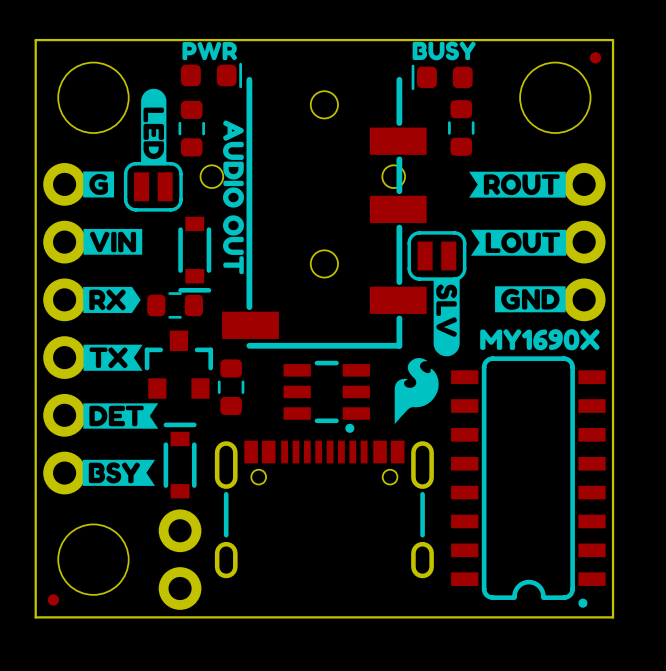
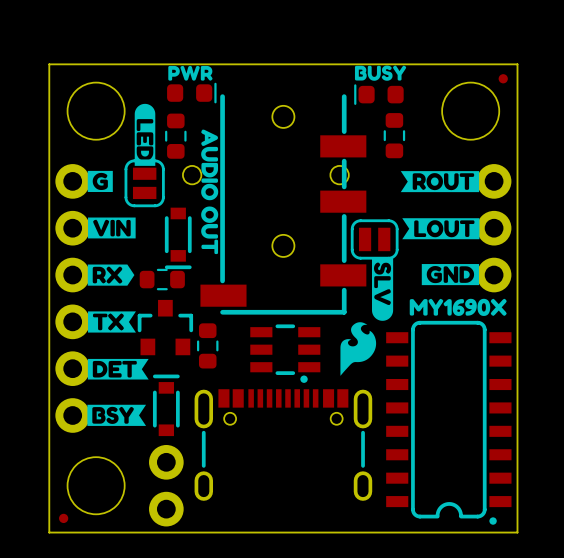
part rotation: 0° (153, 186) -> 90° clockwise (144, 183)

